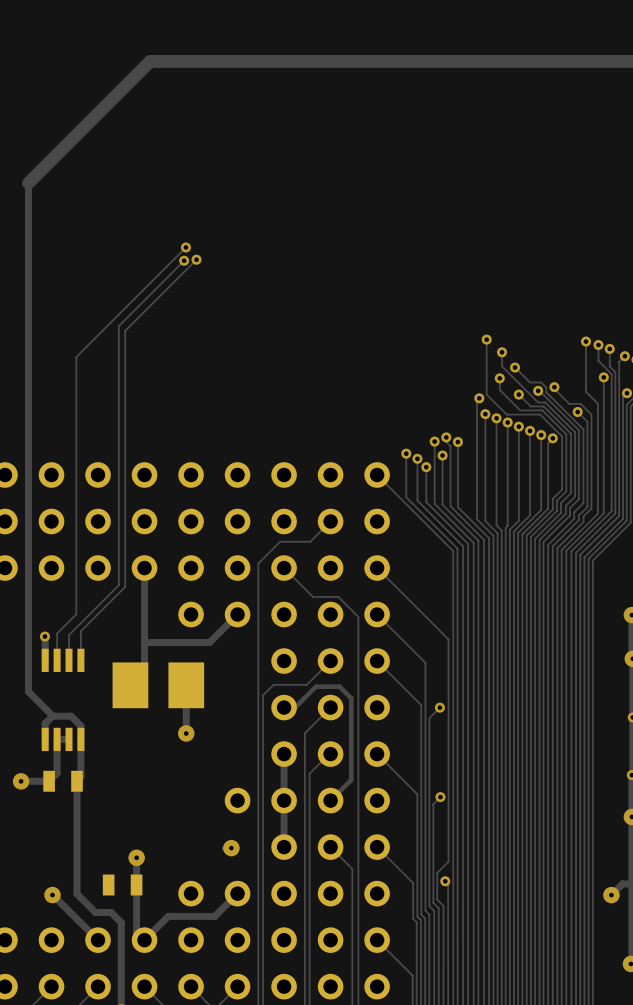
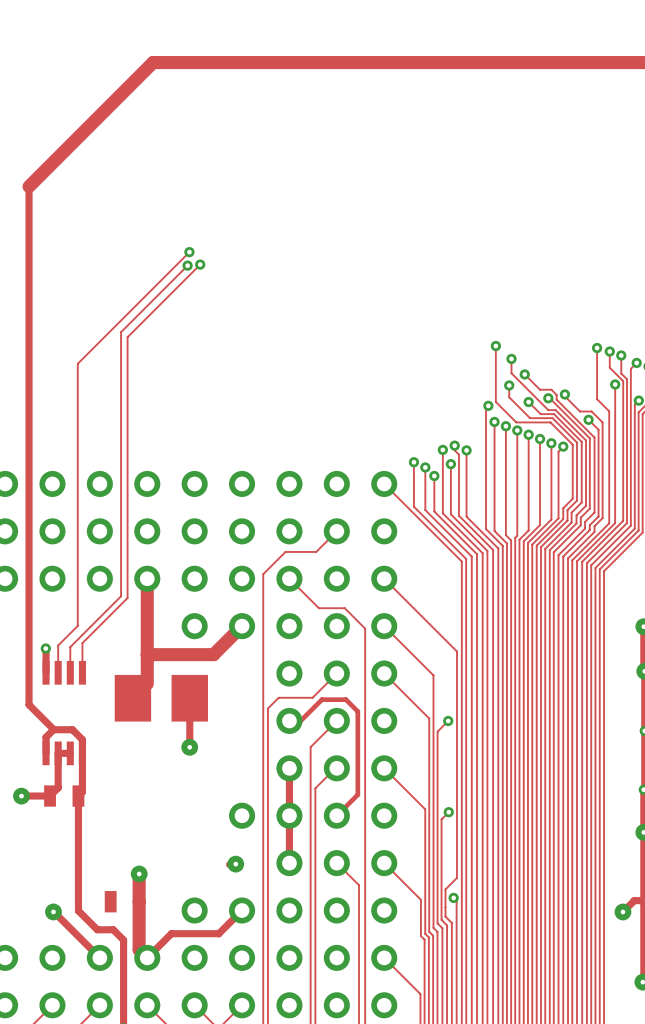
track width: thin (144, 568) (144, 671) -> thick (147, 578) (147, 683)
track width: thin (237, 614) (209, 642) (144, 642) -> thick (242, 626) (213, 654) (147, 654)
track width: thin (136, 857) (136, 932) (144, 940) -> thick (139, 874) (139, 949) (147, 957)

